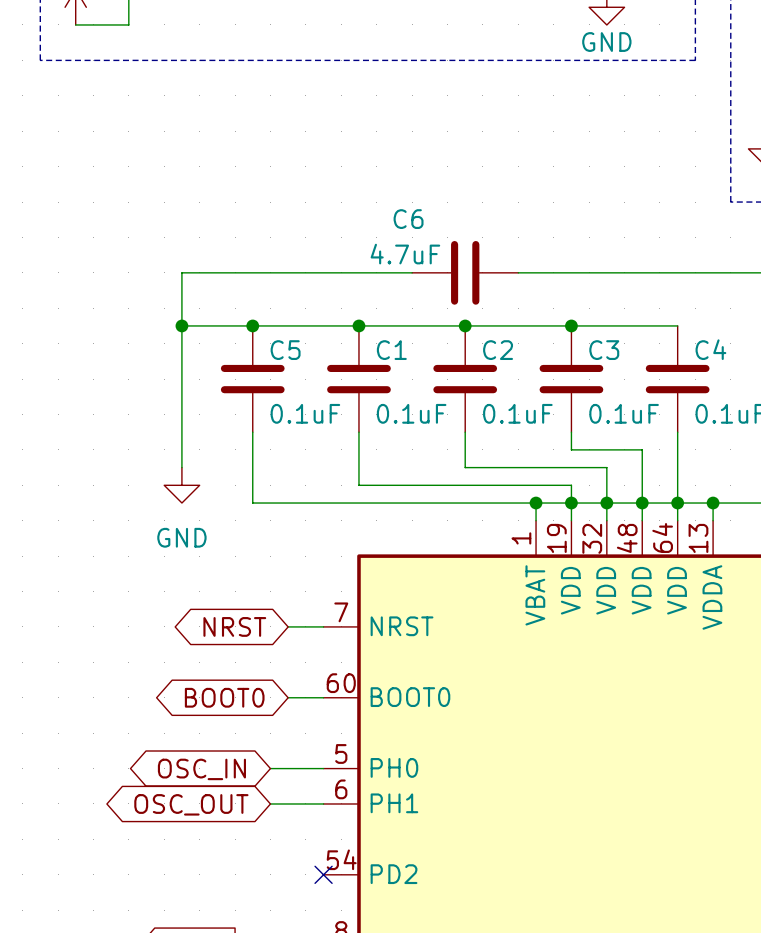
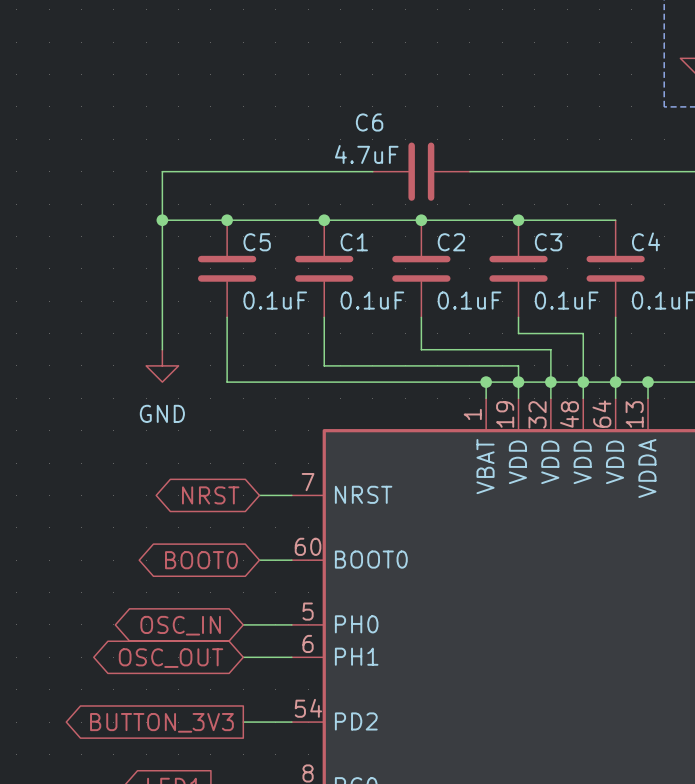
wire: none -> (243, 722) (291, 722)
no-connect mark: (323, 874) -> none
global label: none -> BUTTON_3V3 (161, 722)

